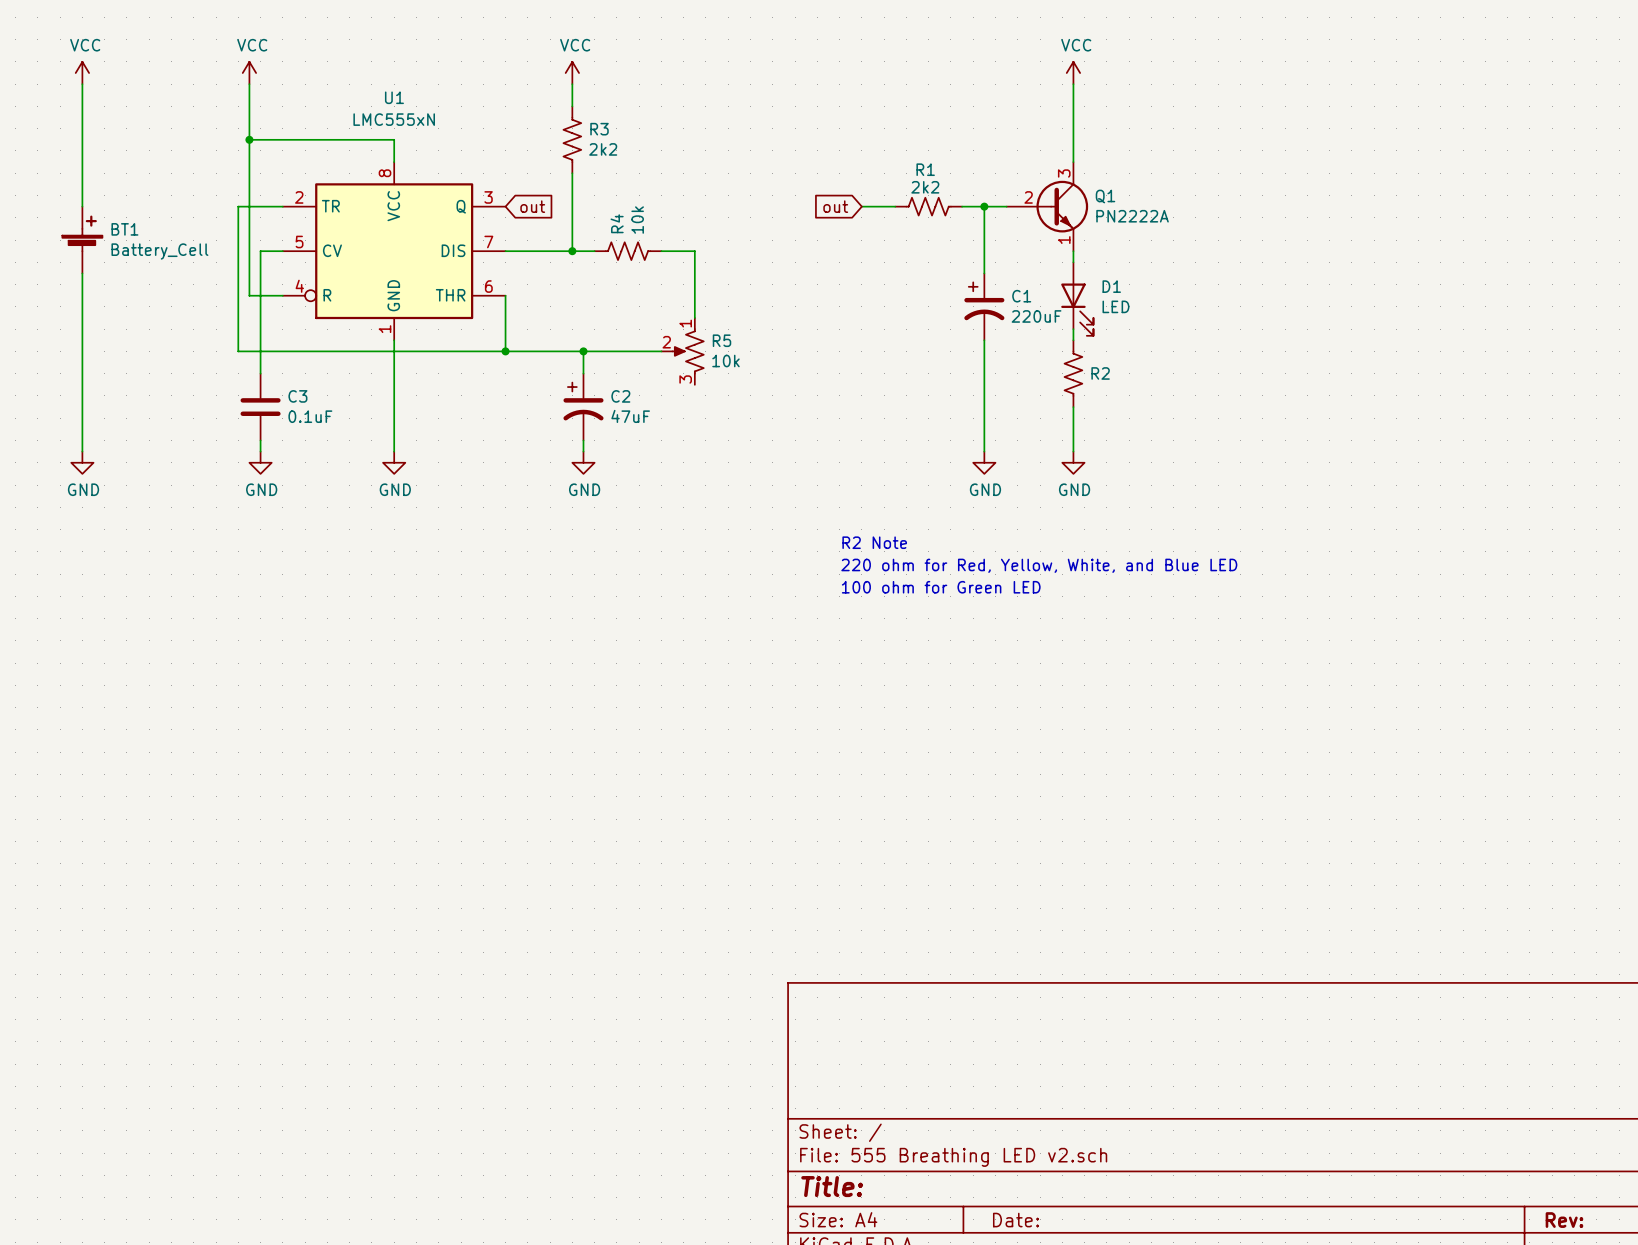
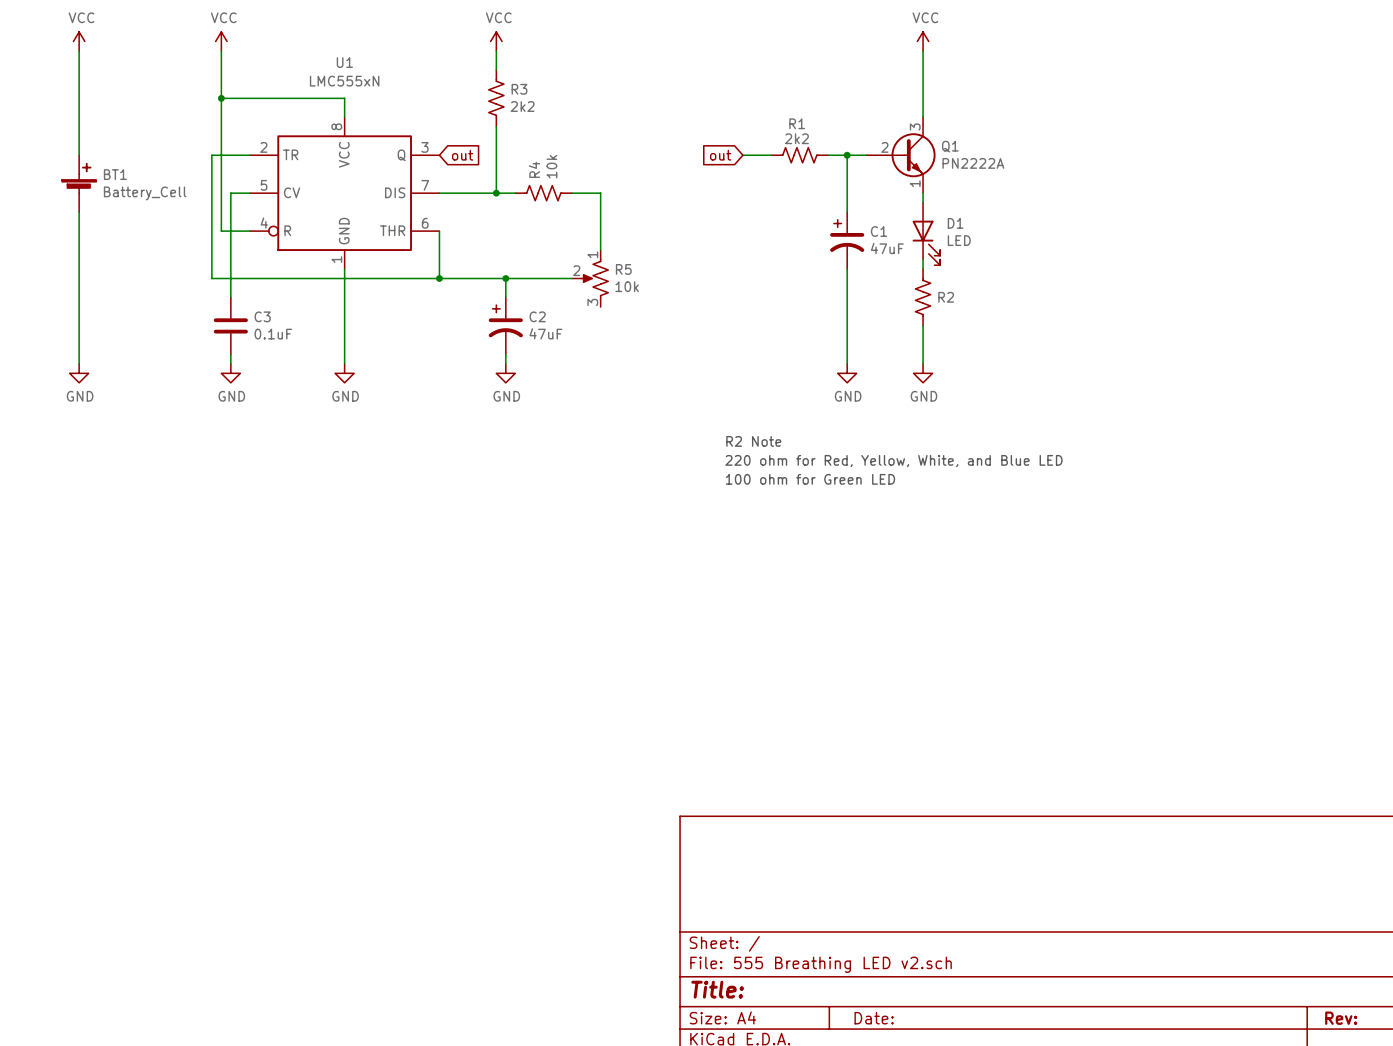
C1 value: 220uF (1036, 316) -> 47uF (887, 248)

